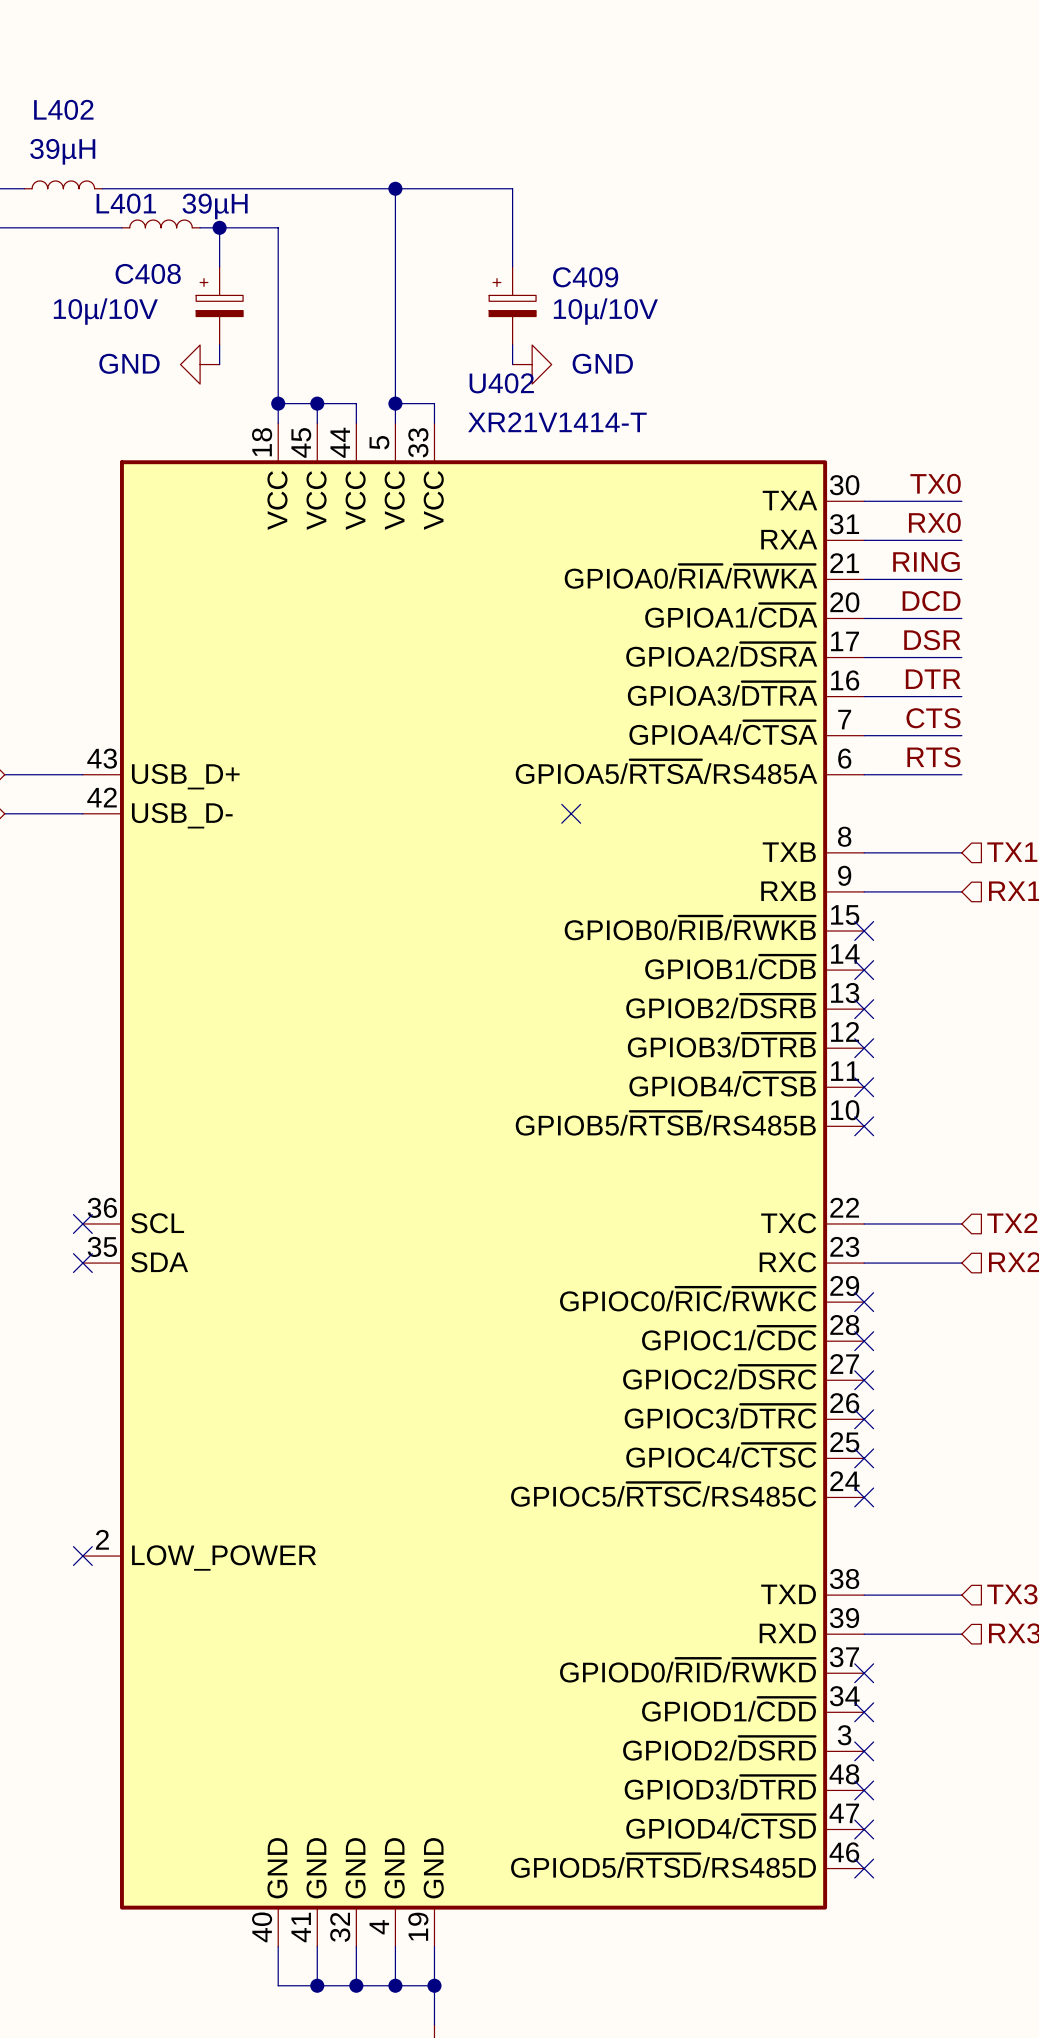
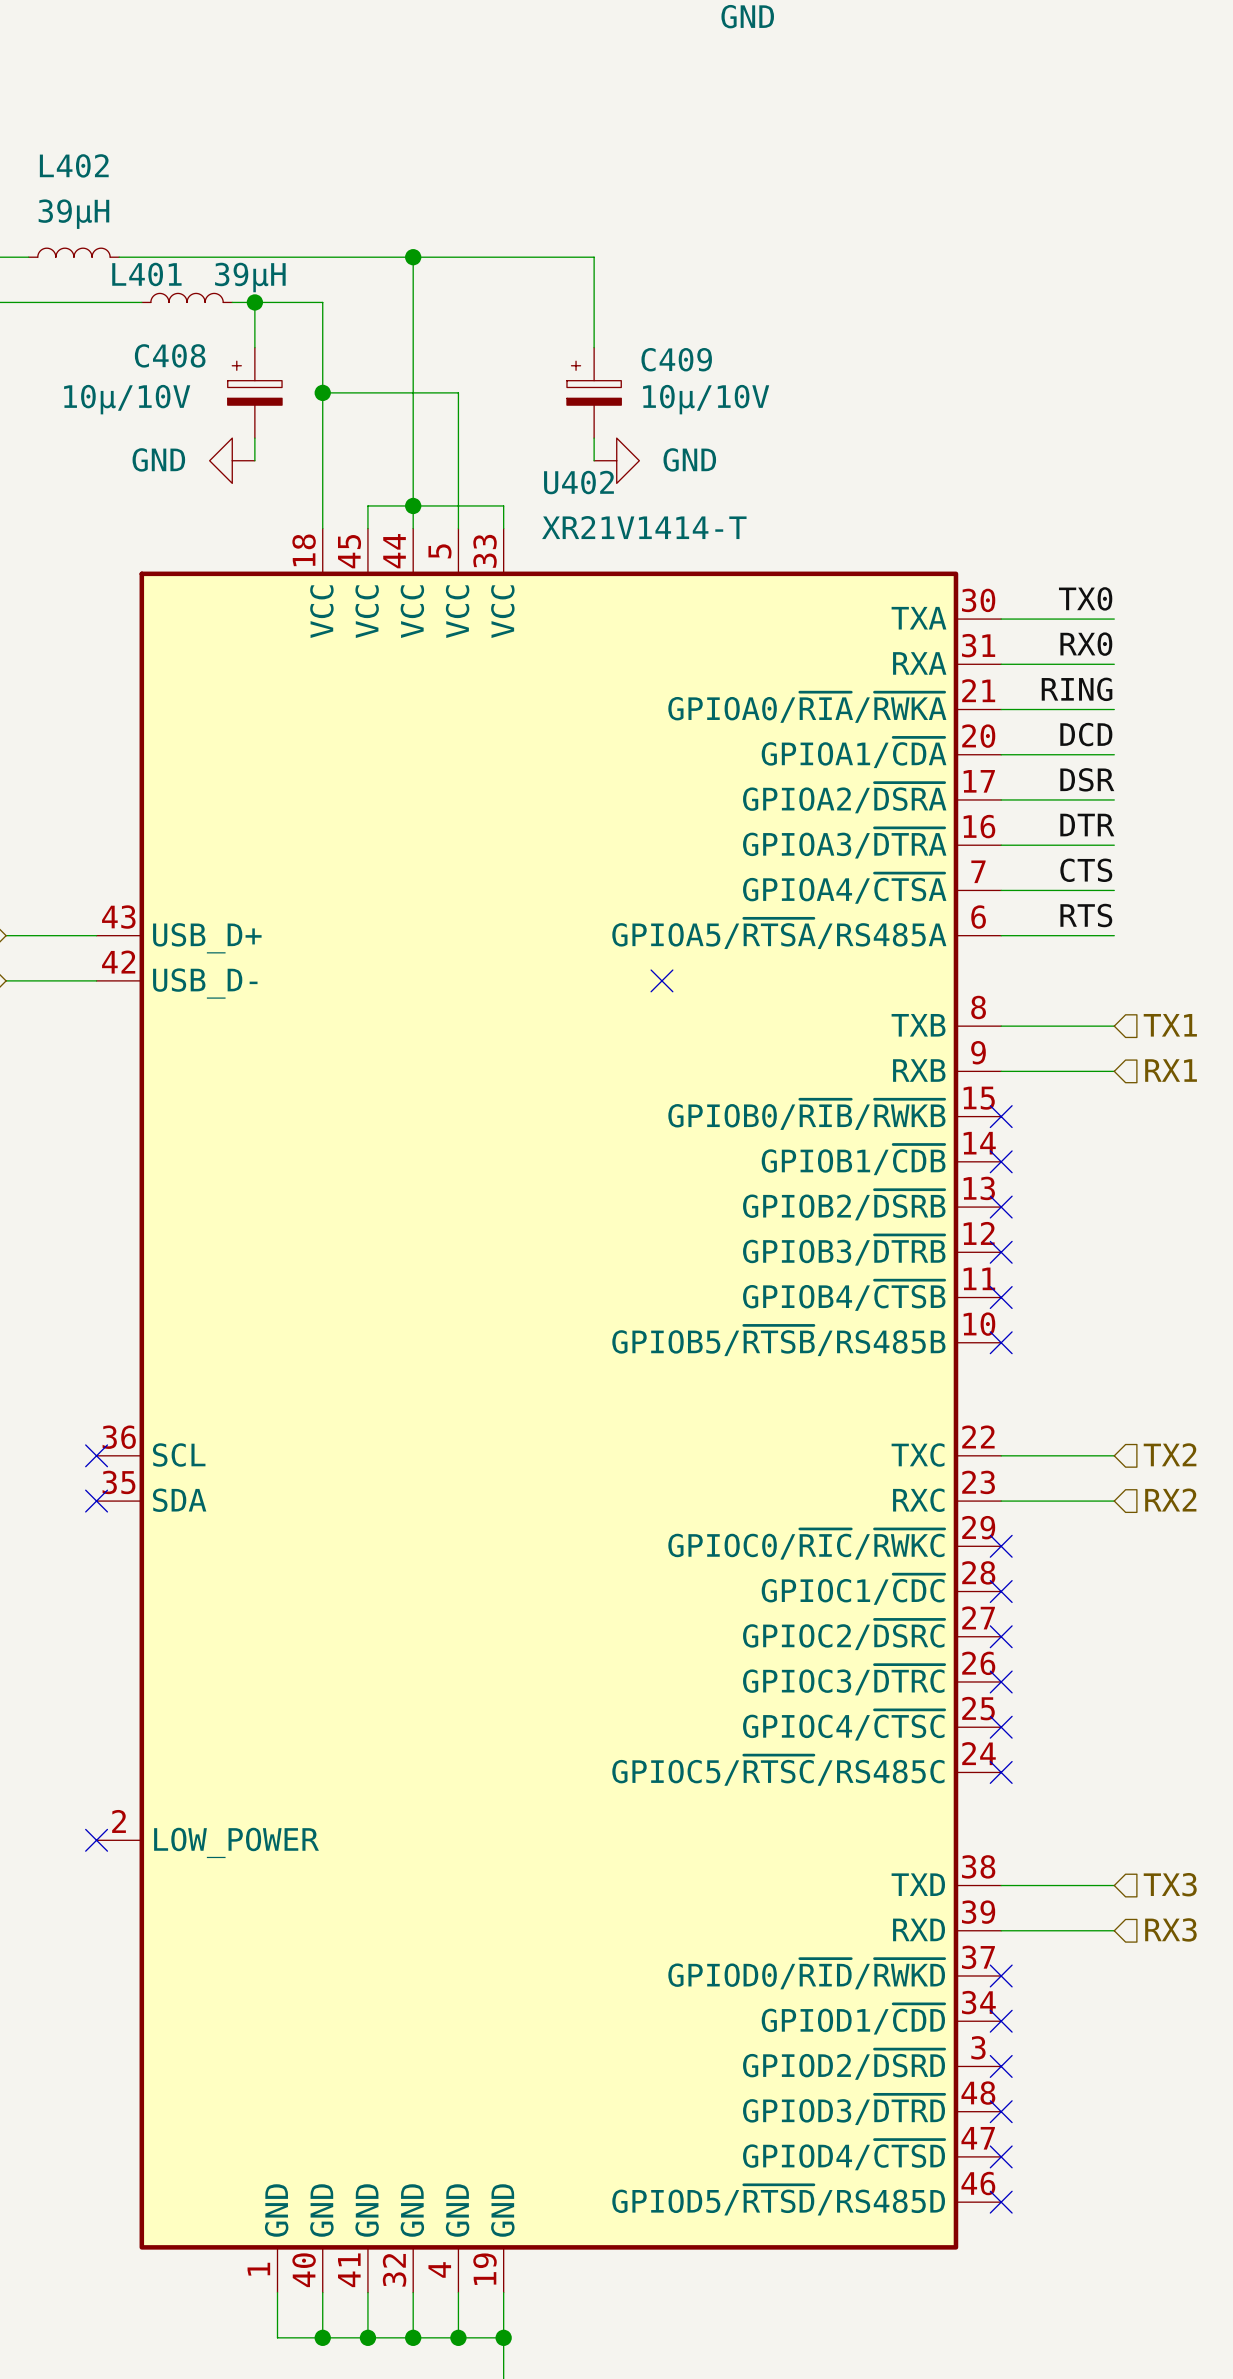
wire: none -> (413, 257) (413, 505) (458, 505)
wire: (395, 188) (395, 305) -> (322, 392) (458, 392)
junction position: (395, 188) -> (413, 257)
junction: none -> (322, 392)
wire: (278, 403) (317, 403) -> none
junction: (278, 403) -> none
junction: (317, 403) -> none
junction: none -> (413, 505)
junction: (395, 403) -> none
U402 symbol: [82, 423, 865, 1947] -> [96, 528, 1002, 2293]
wire: none -> (277, 2292) (277, 2337) (322, 2337)
junction: none -> (322, 2337)

